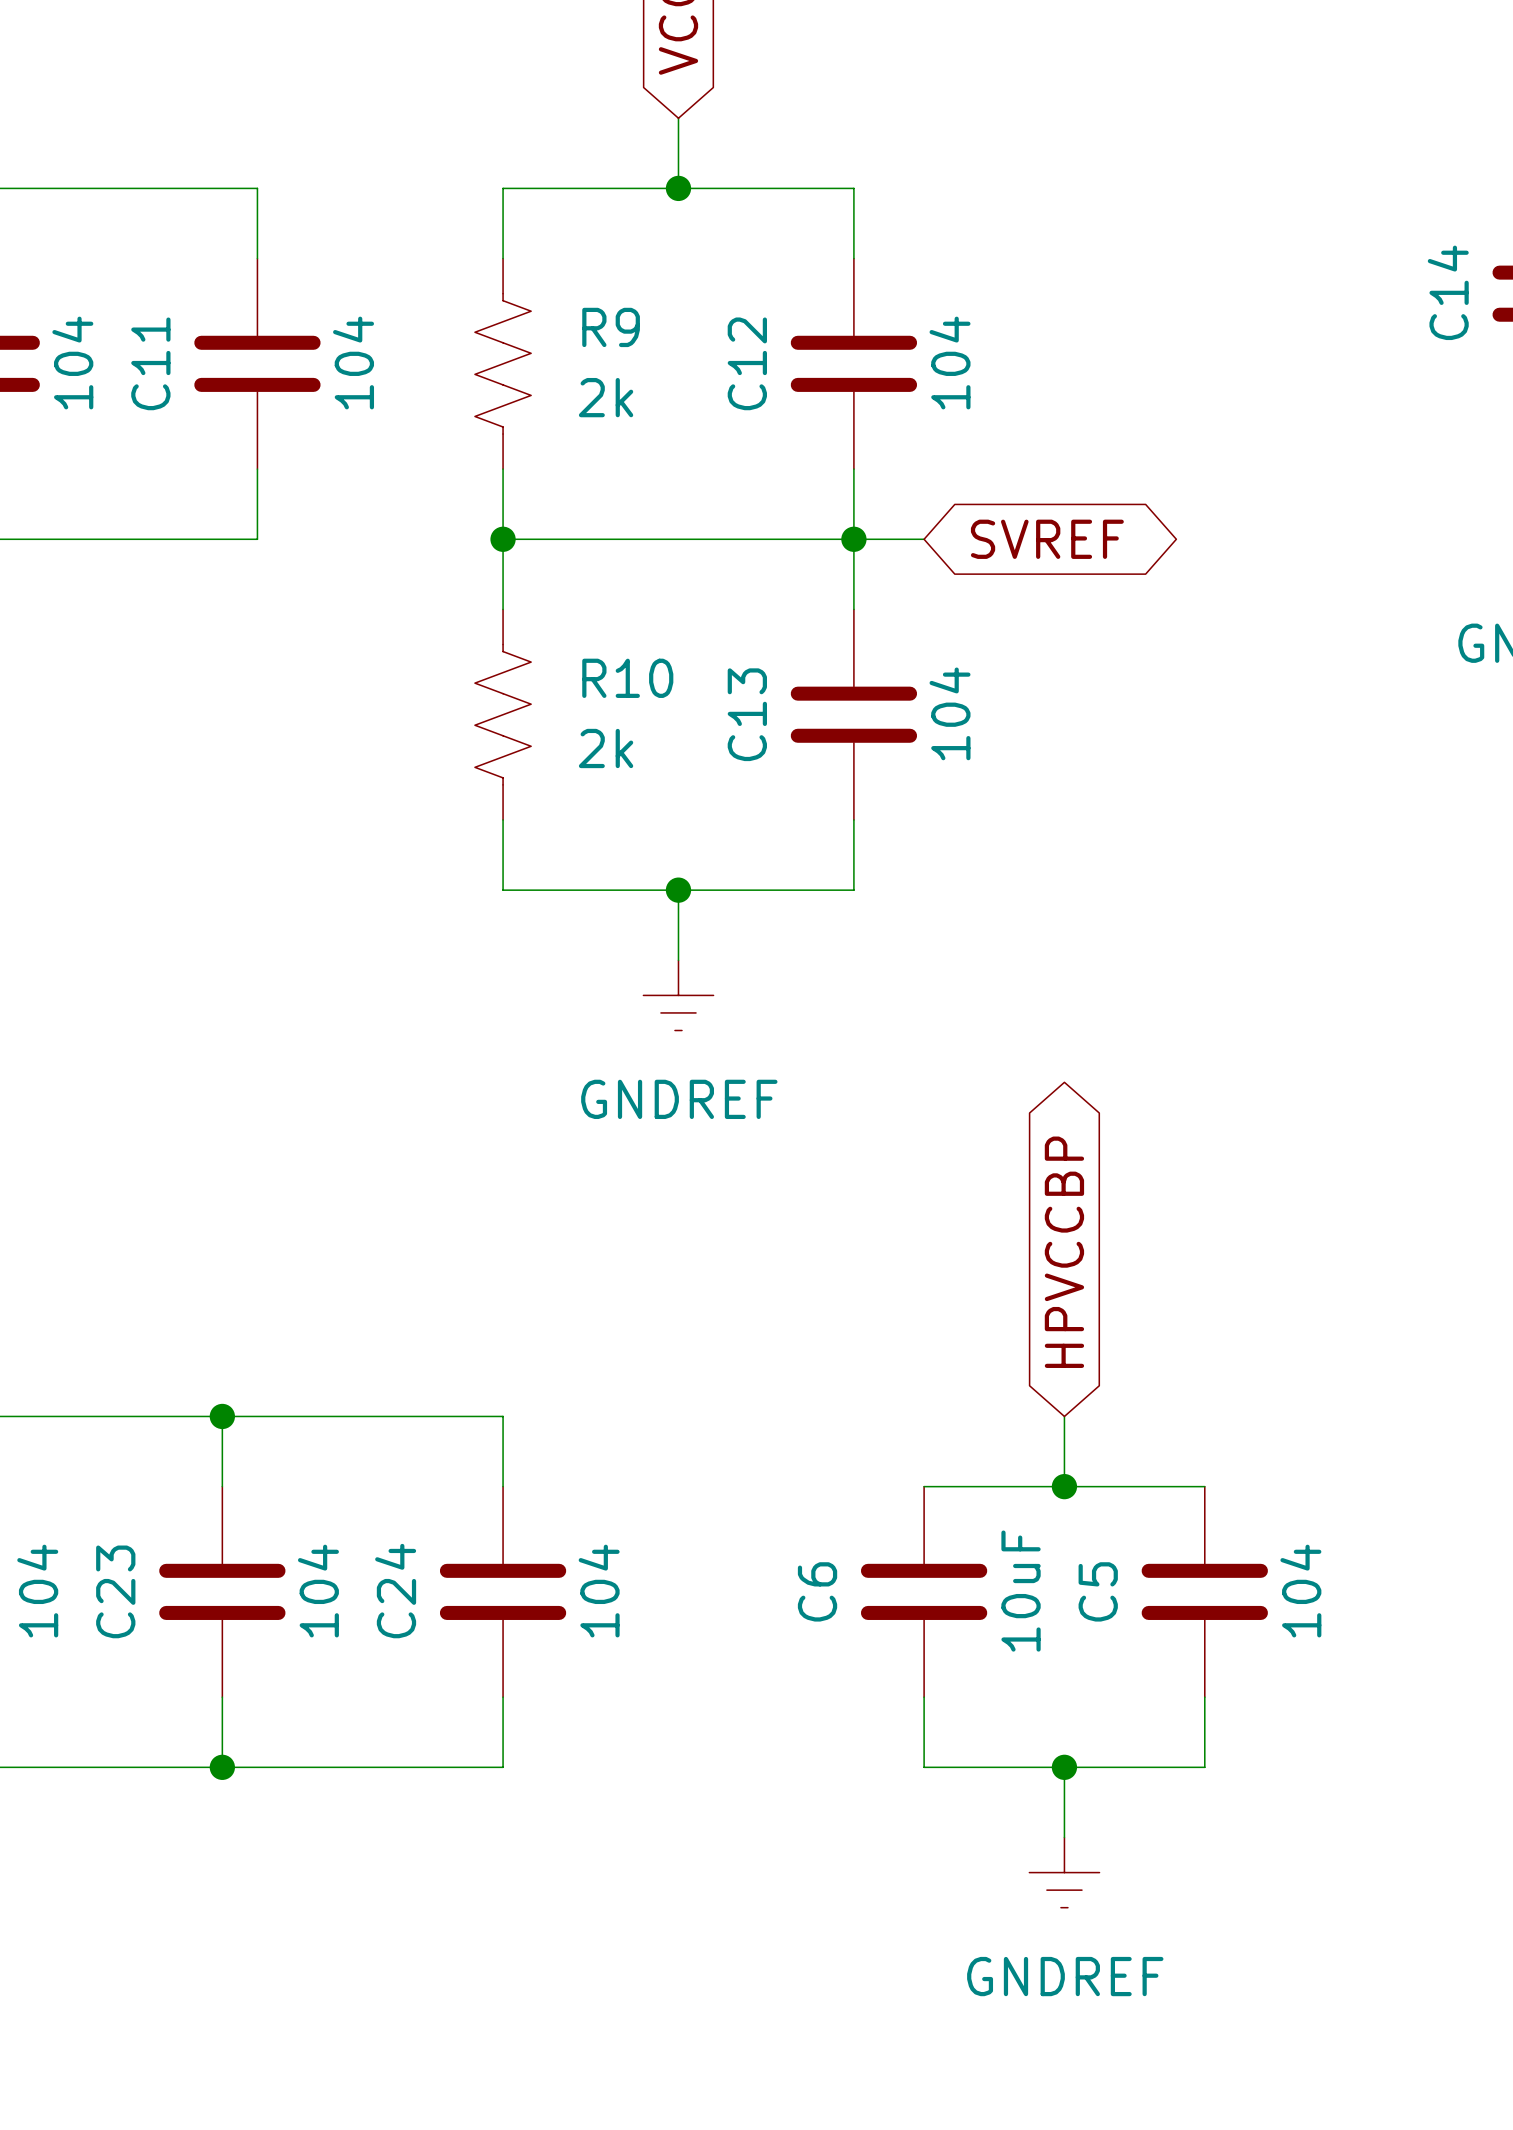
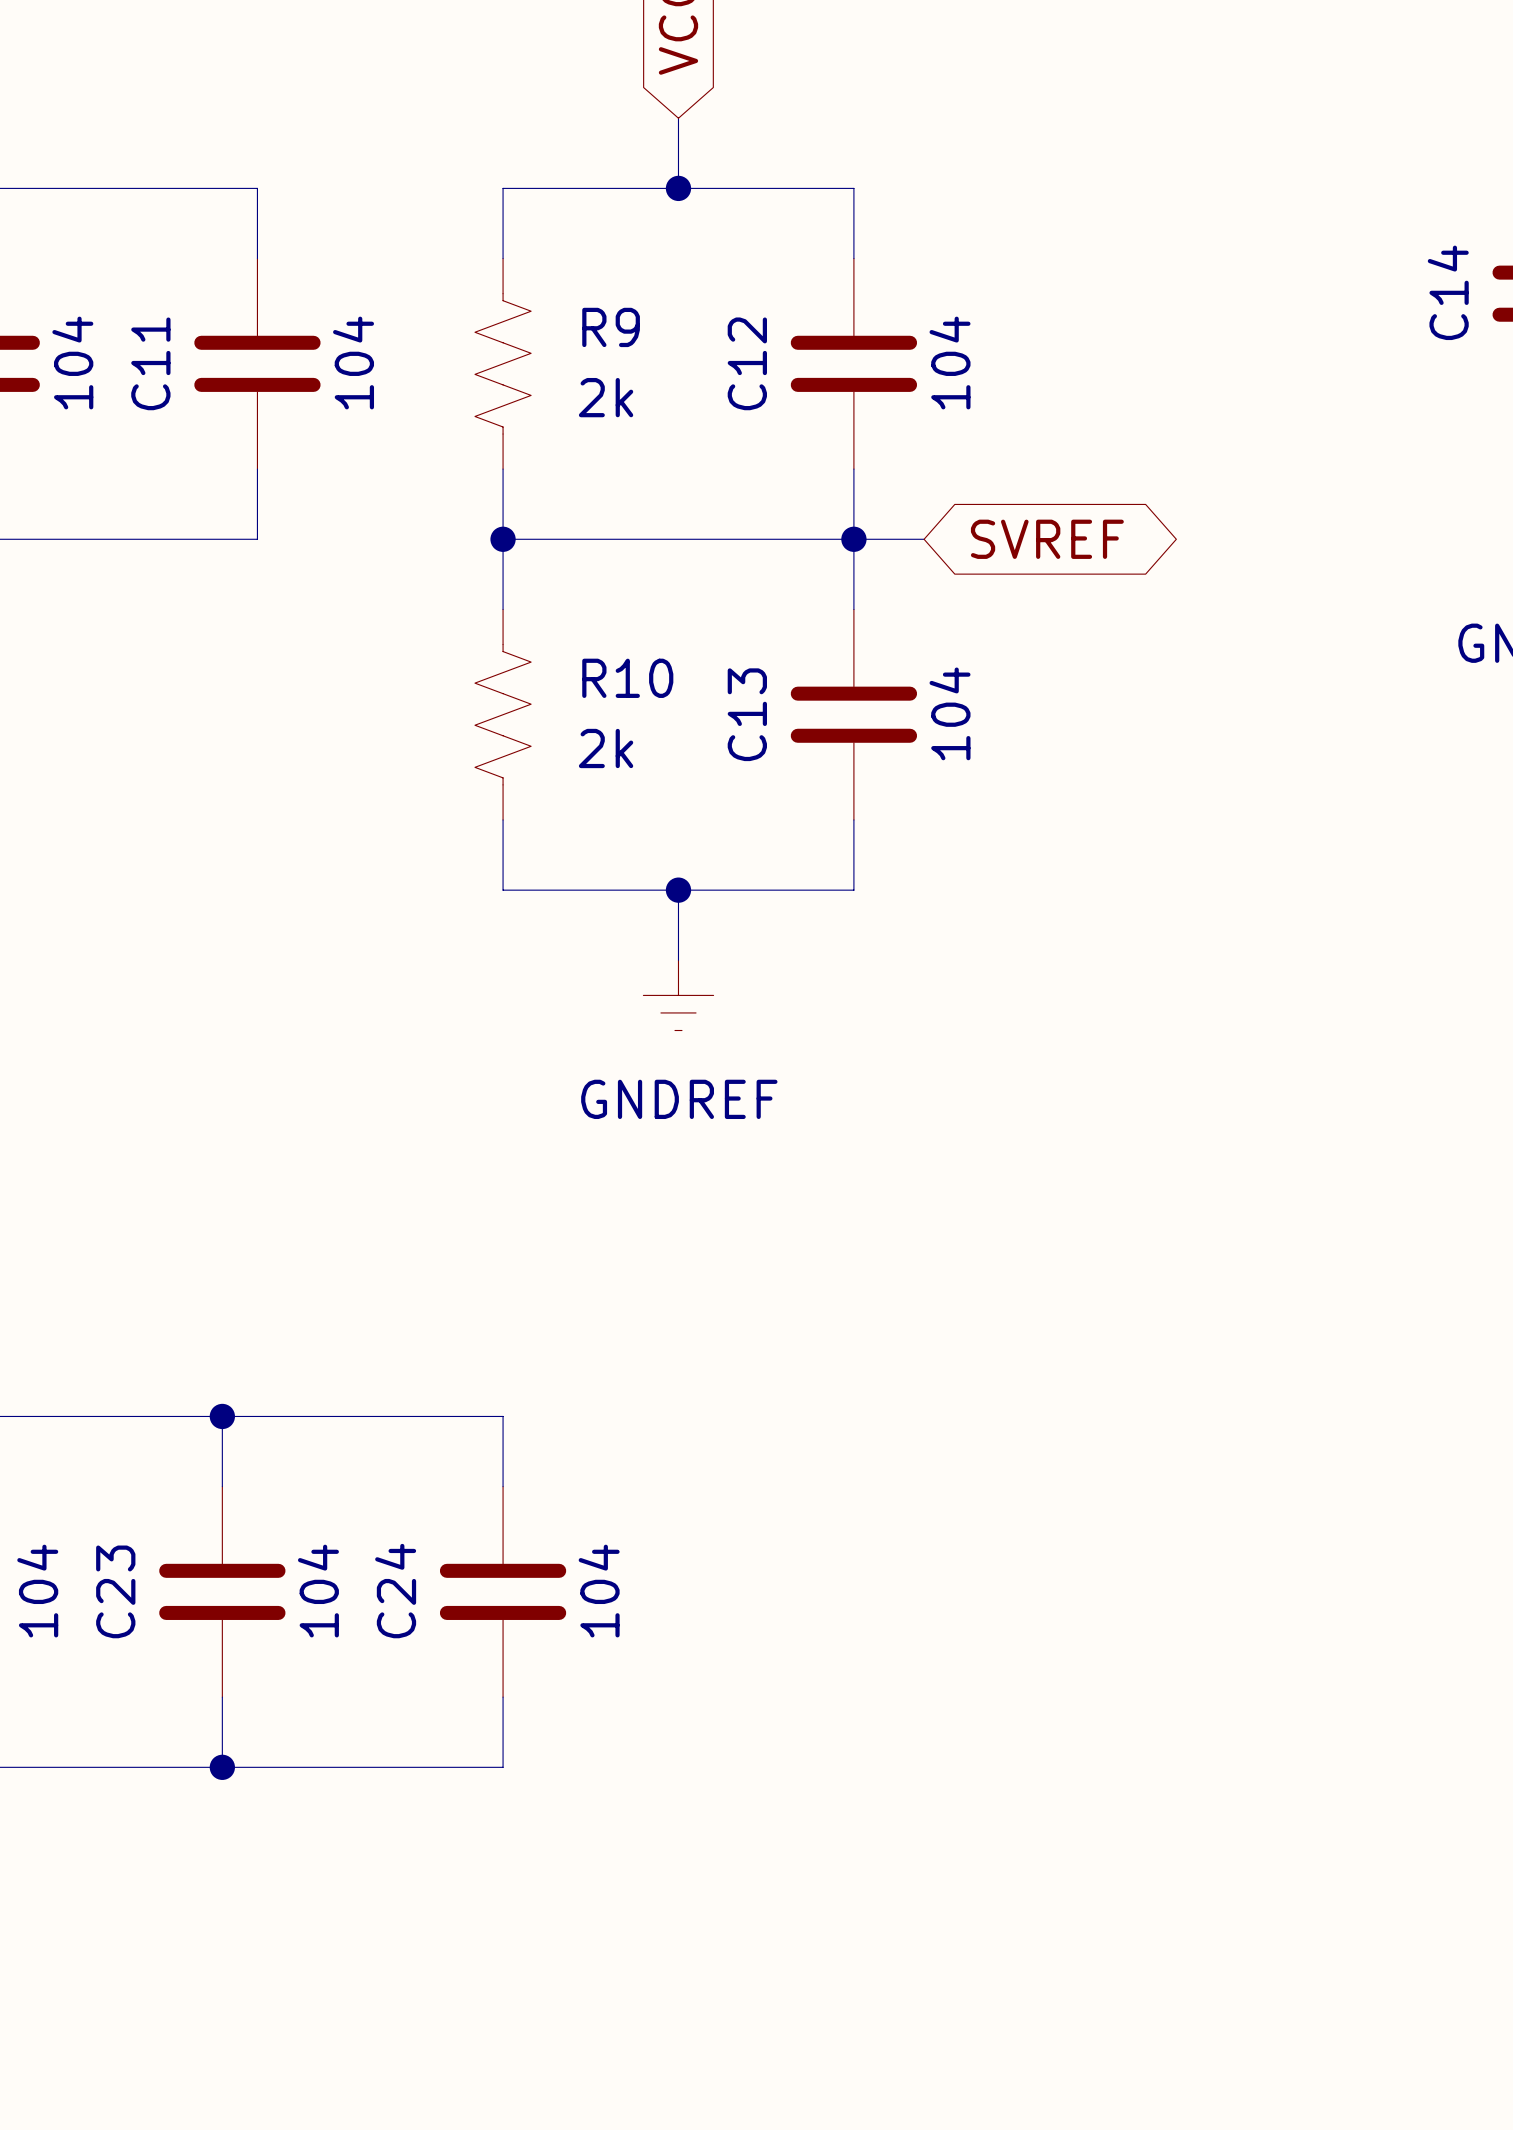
global label: HPVCCBP (1064, 1252) -> none
wire: (1064, 1416) (1064, 1486) -> none
wire: (924, 1486) (1204, 1486) -> none
junction: (1064, 1486) -> none
C6: 10uF (924, 1591) -> none
C5: 104 (1204, 1591) -> none
wire: (924, 1697) (924, 1767) (1204, 1767) (1204, 1697) -> none
wire: (1064, 1767) (1064, 1837) -> none
junction: (1064, 1767) -> none
power symbol: GNDREF (1064, 1872) -> none

